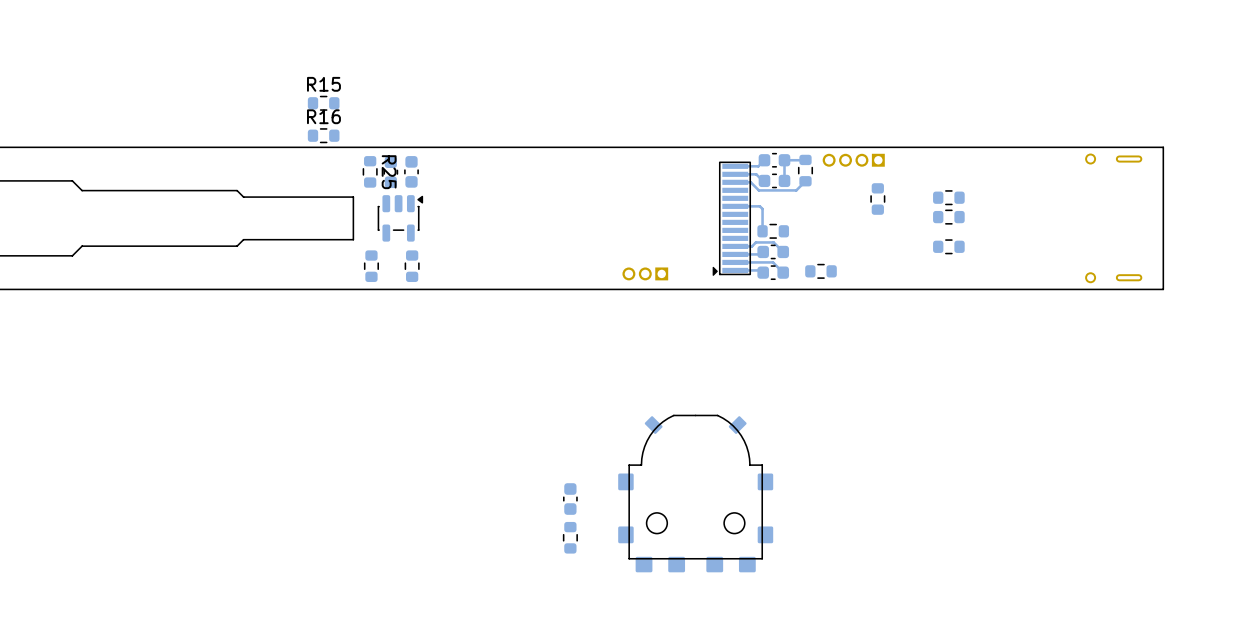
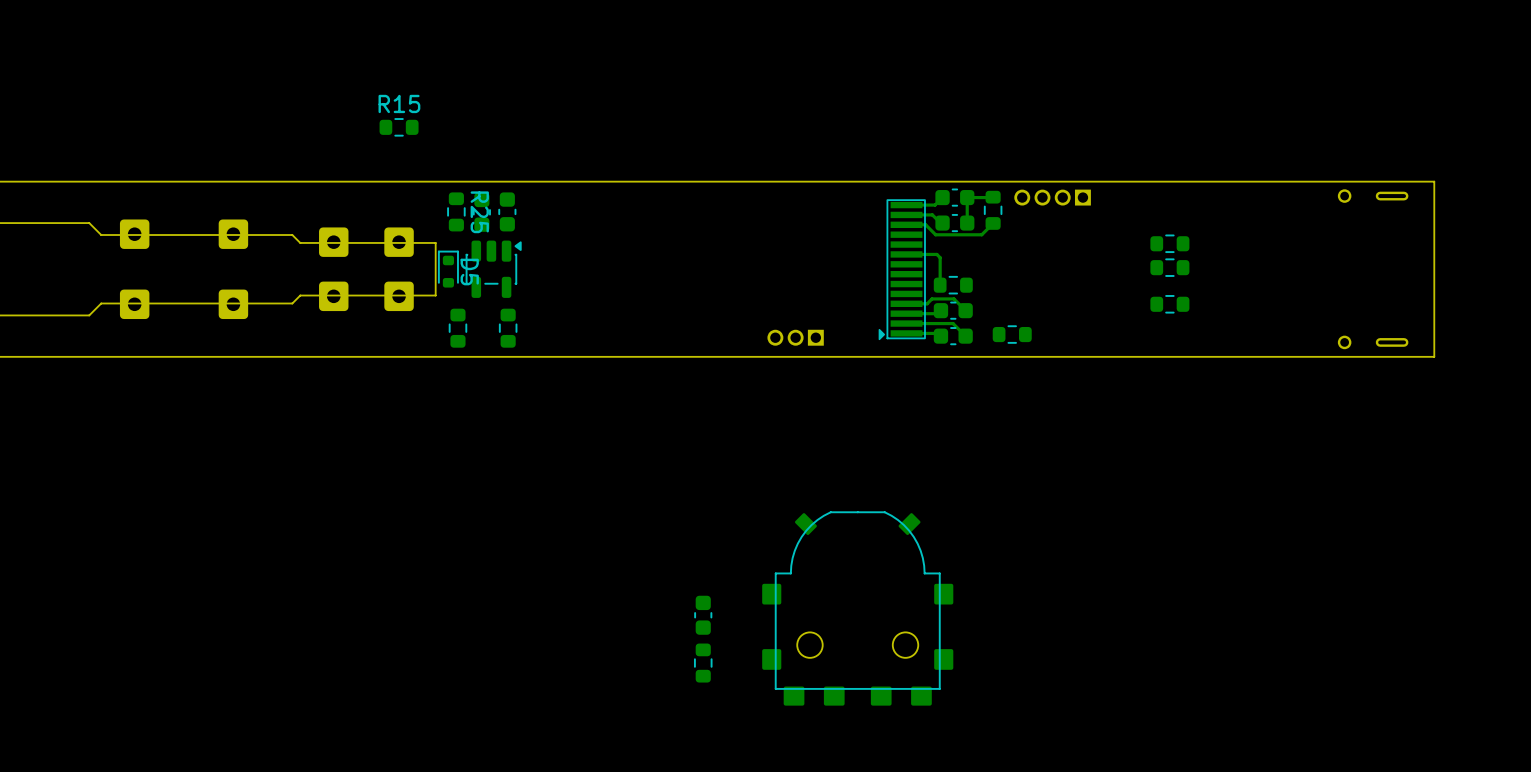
R16: (323, 135) -> none
part: none -> (134, 234)
part: none -> (233, 234)
part: none -> (333, 242)
part: none -> (399, 242)
part: (877, 199) -> none
D5: none -> (448, 269)
part: none -> (333, 296)
part: none -> (399, 296)
part: none -> (134, 304)
part: none -> (233, 304)

